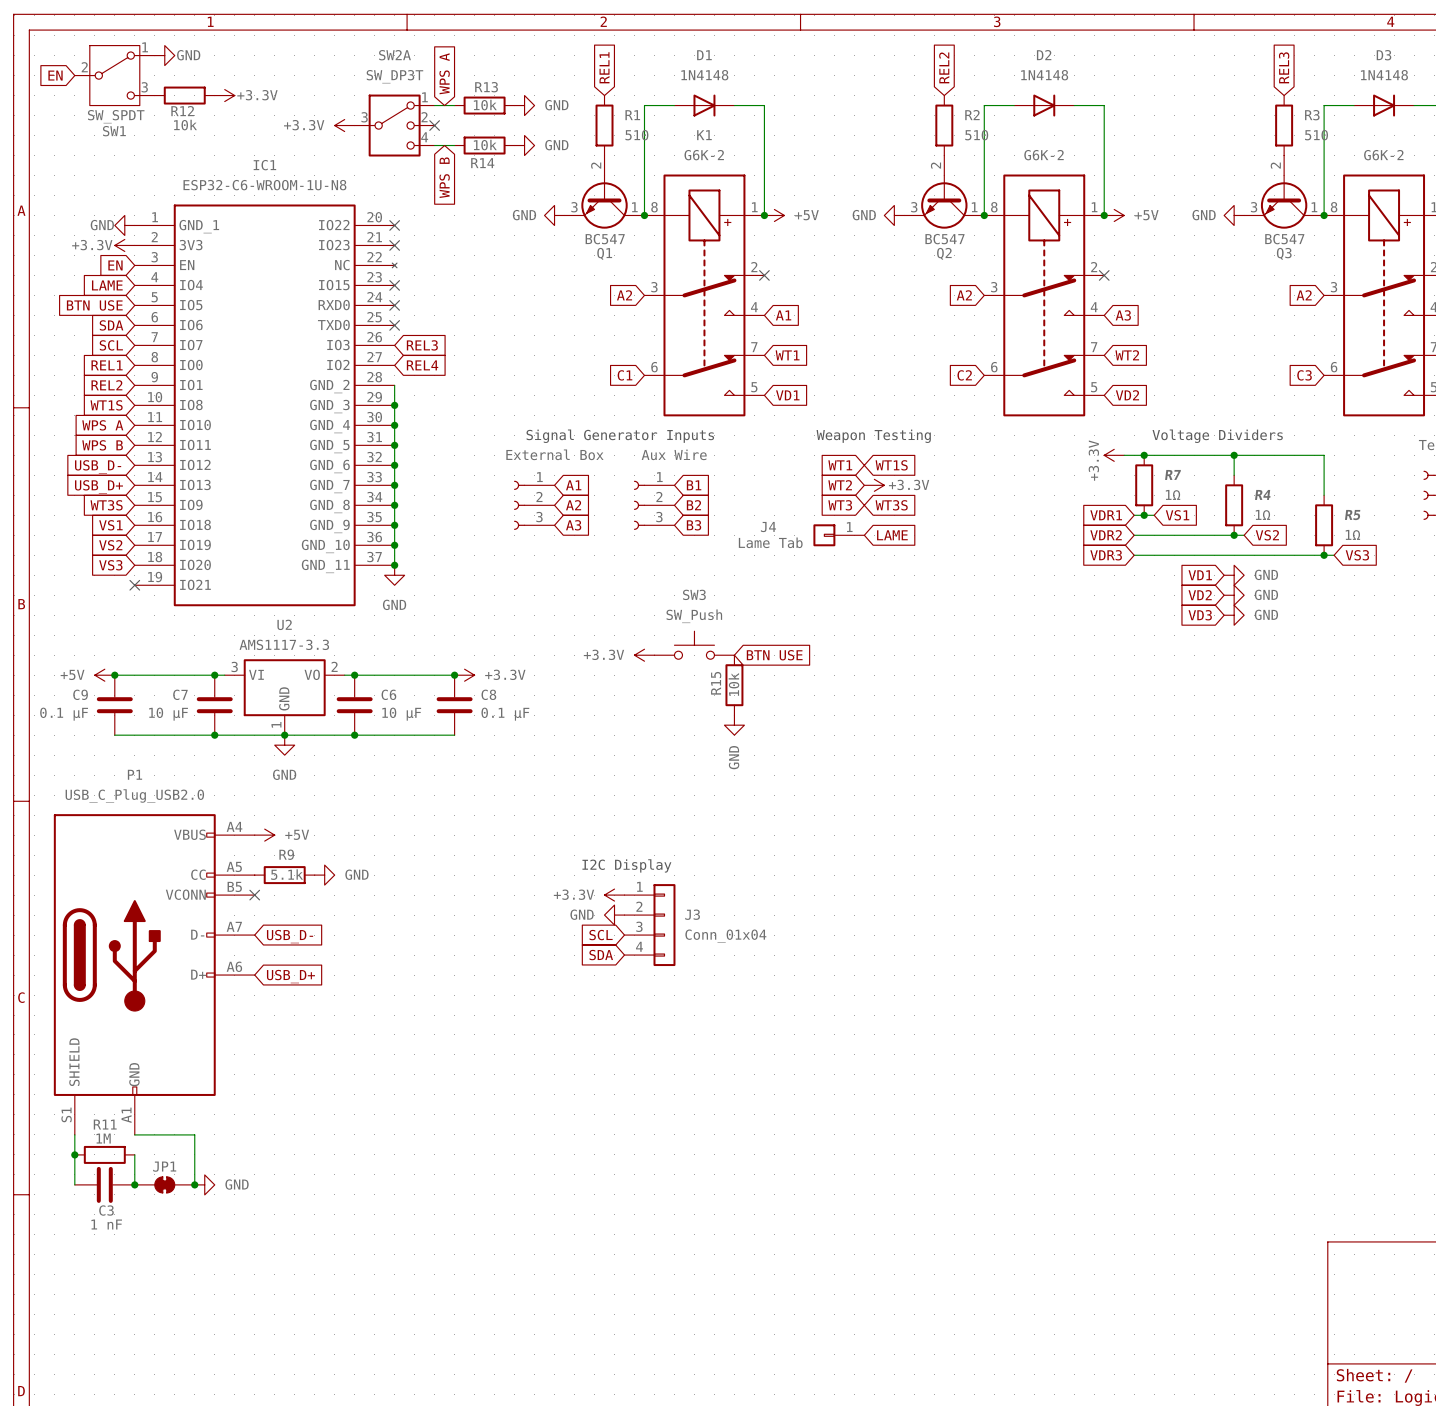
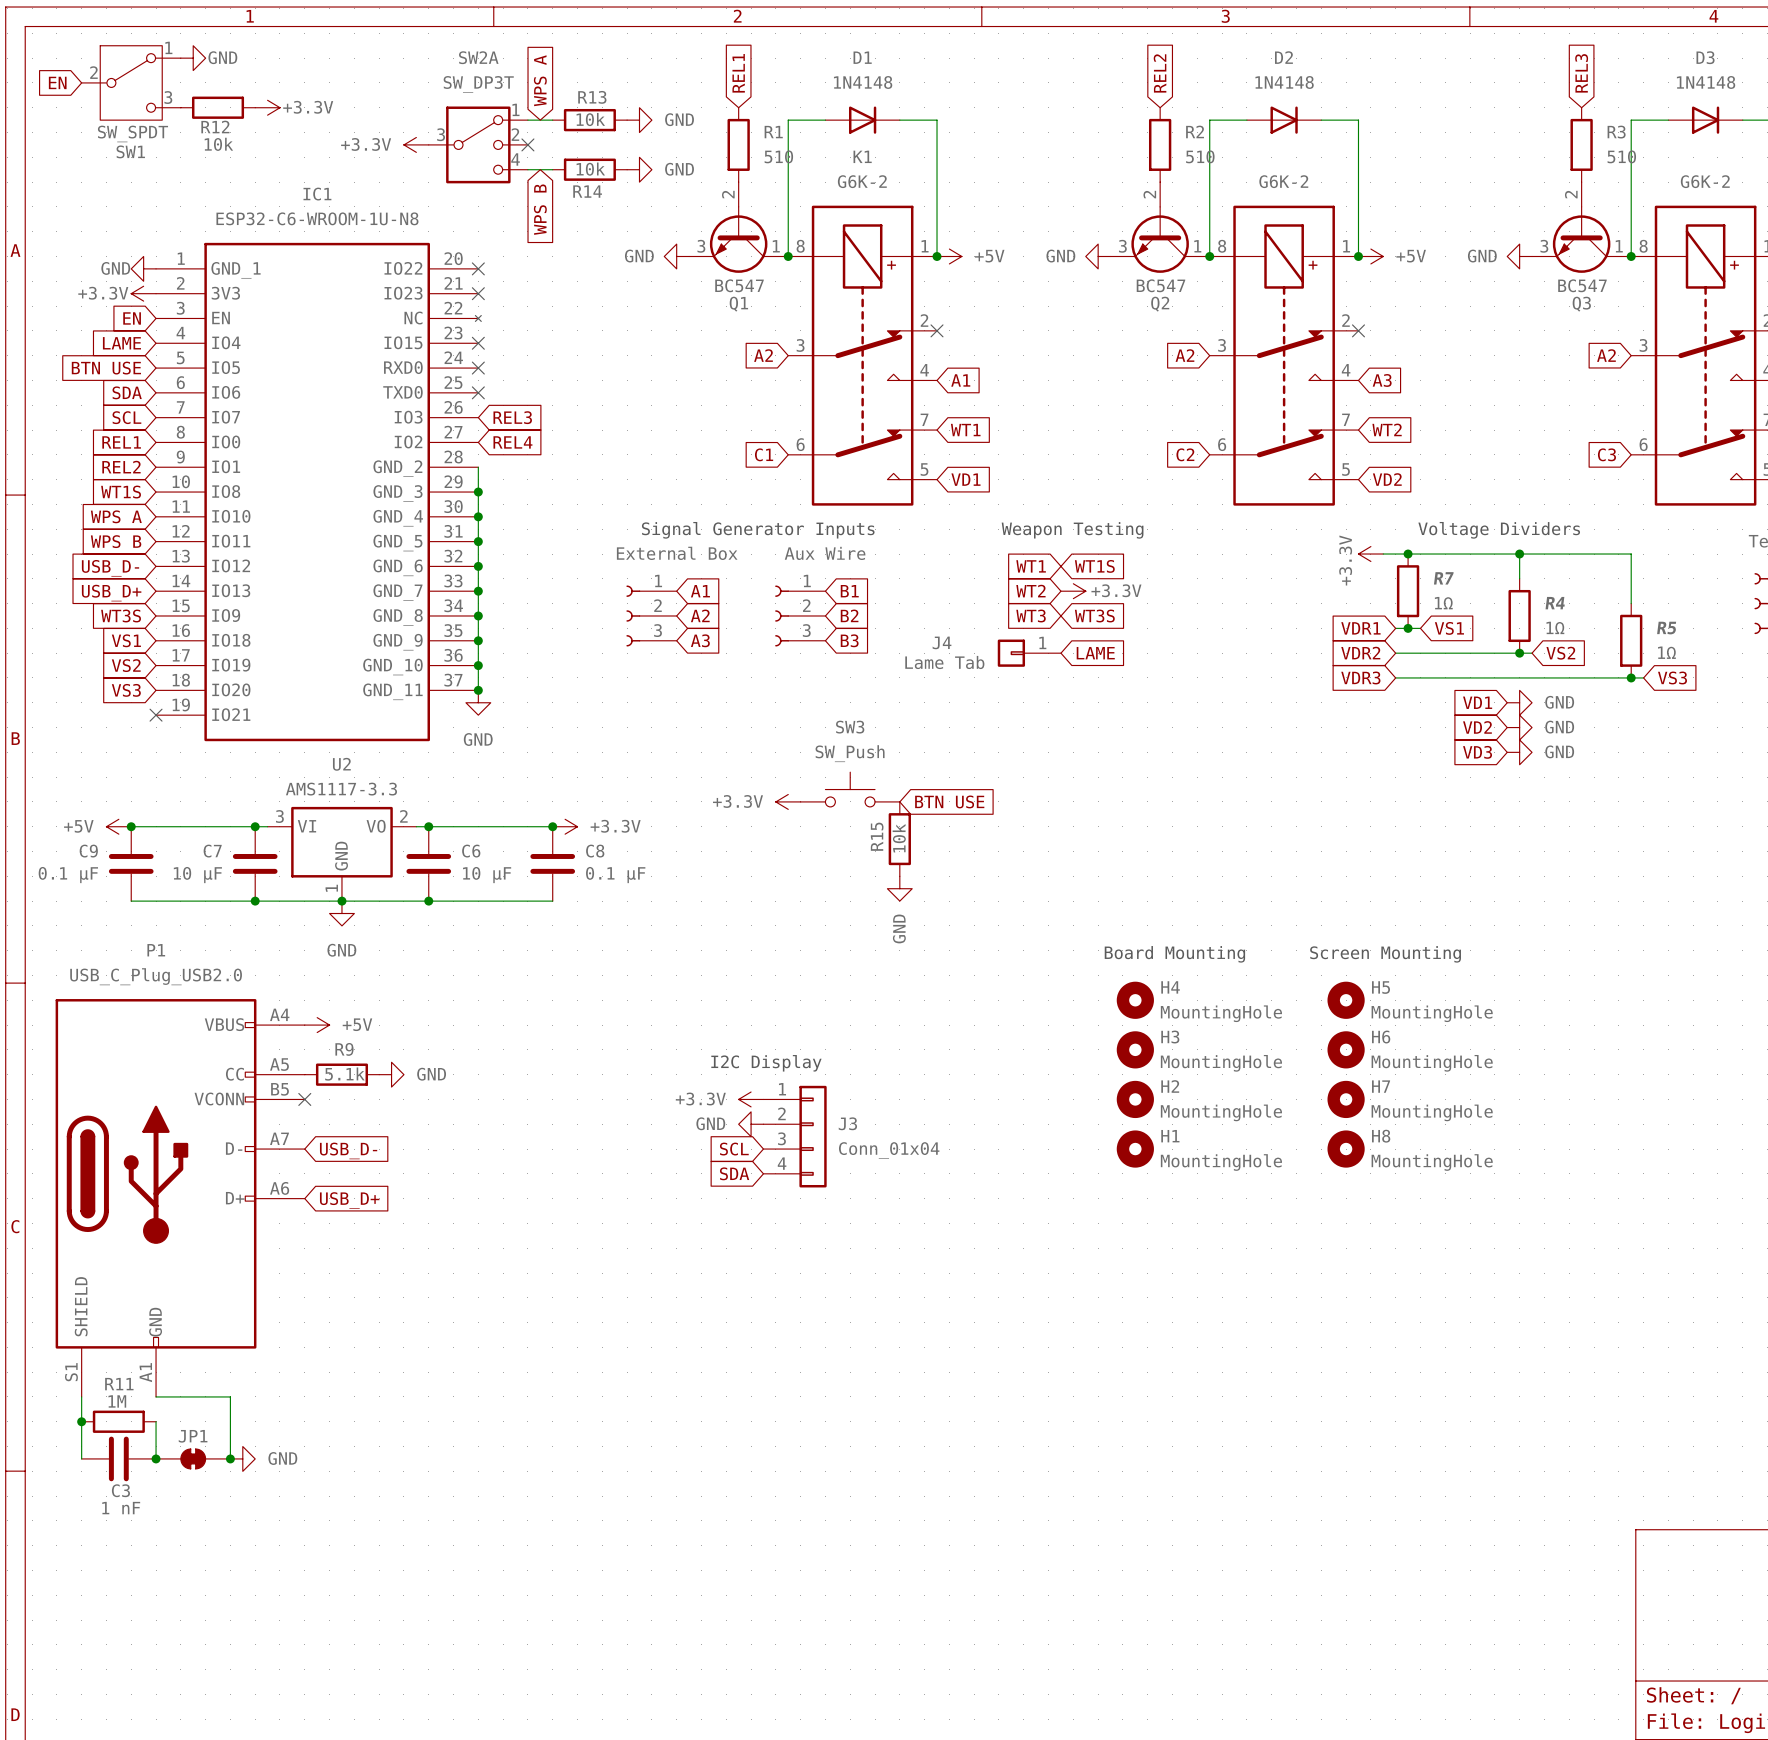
text: none -> Board Mounting (1174, 954)
text: none -> Screen Mounting (1385, 954)
H4: none -> MountingHole (1135, 1000)
H5: none -> MountingHole (1346, 1000)
H3: none -> MountingHole (1135, 1049)
H6: none -> MountingHole (1346, 1049)
H2: none -> MountingHole (1135, 1099)
H7: none -> MountingHole (1346, 1099)
H1: none -> MountingHole (1135, 1149)
H8: none -> MountingHole (1346, 1149)

